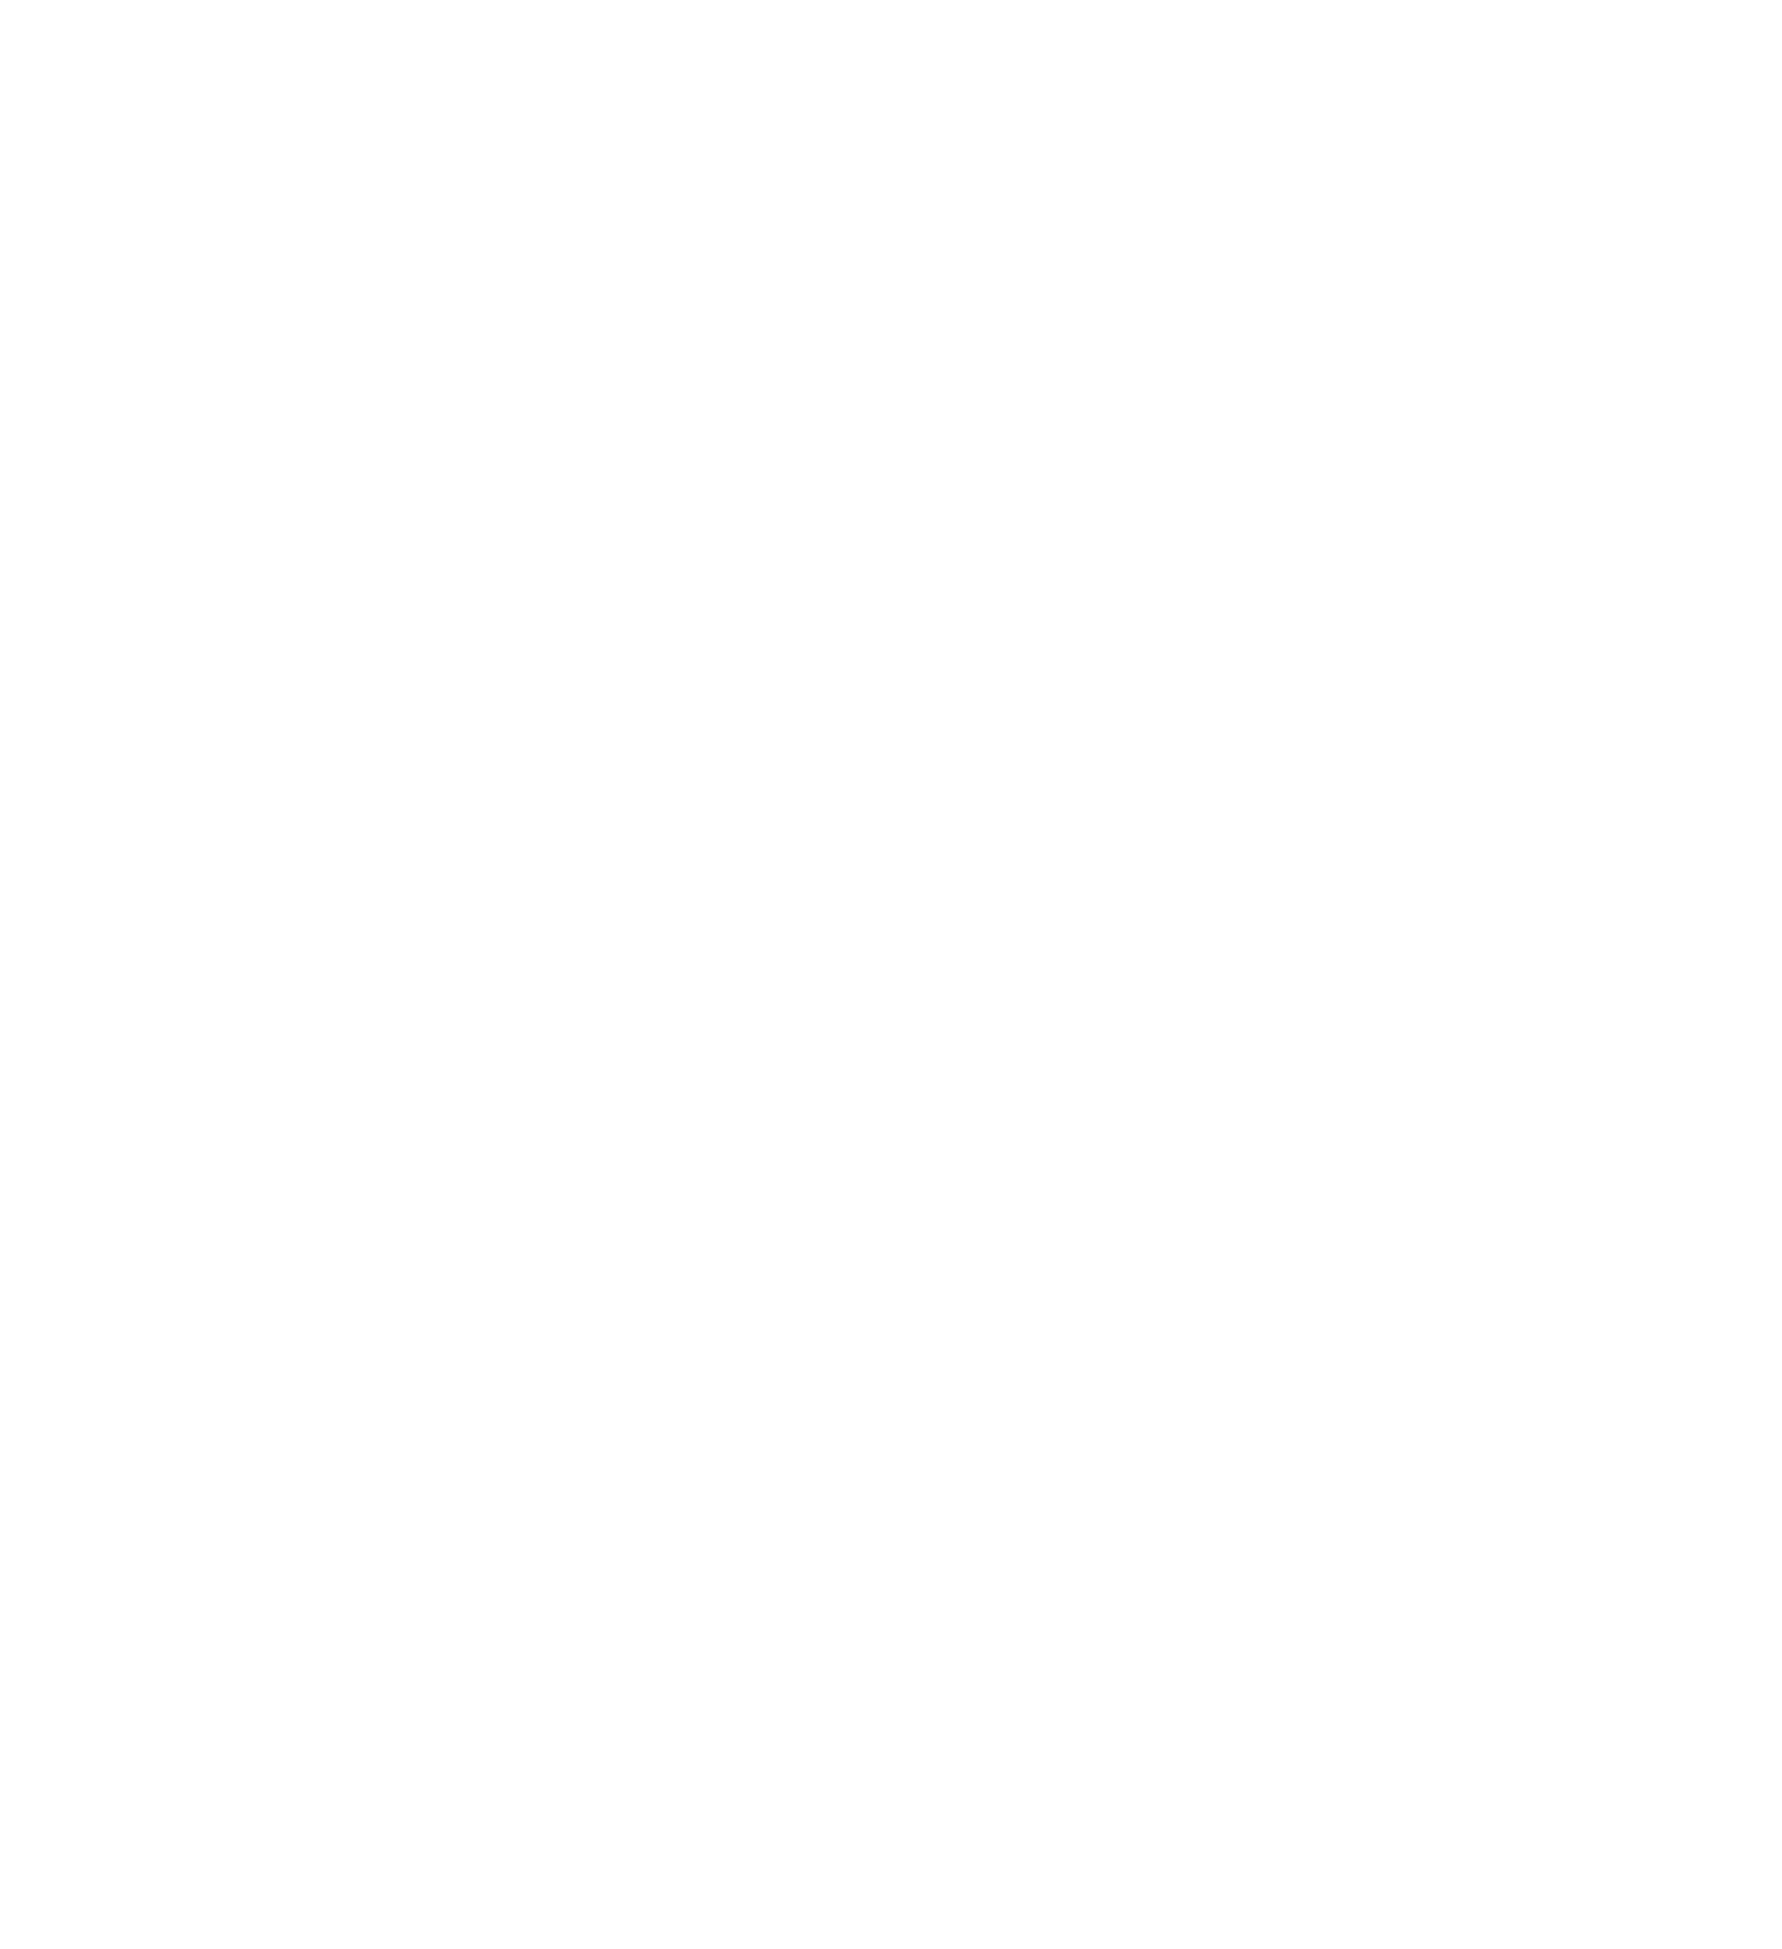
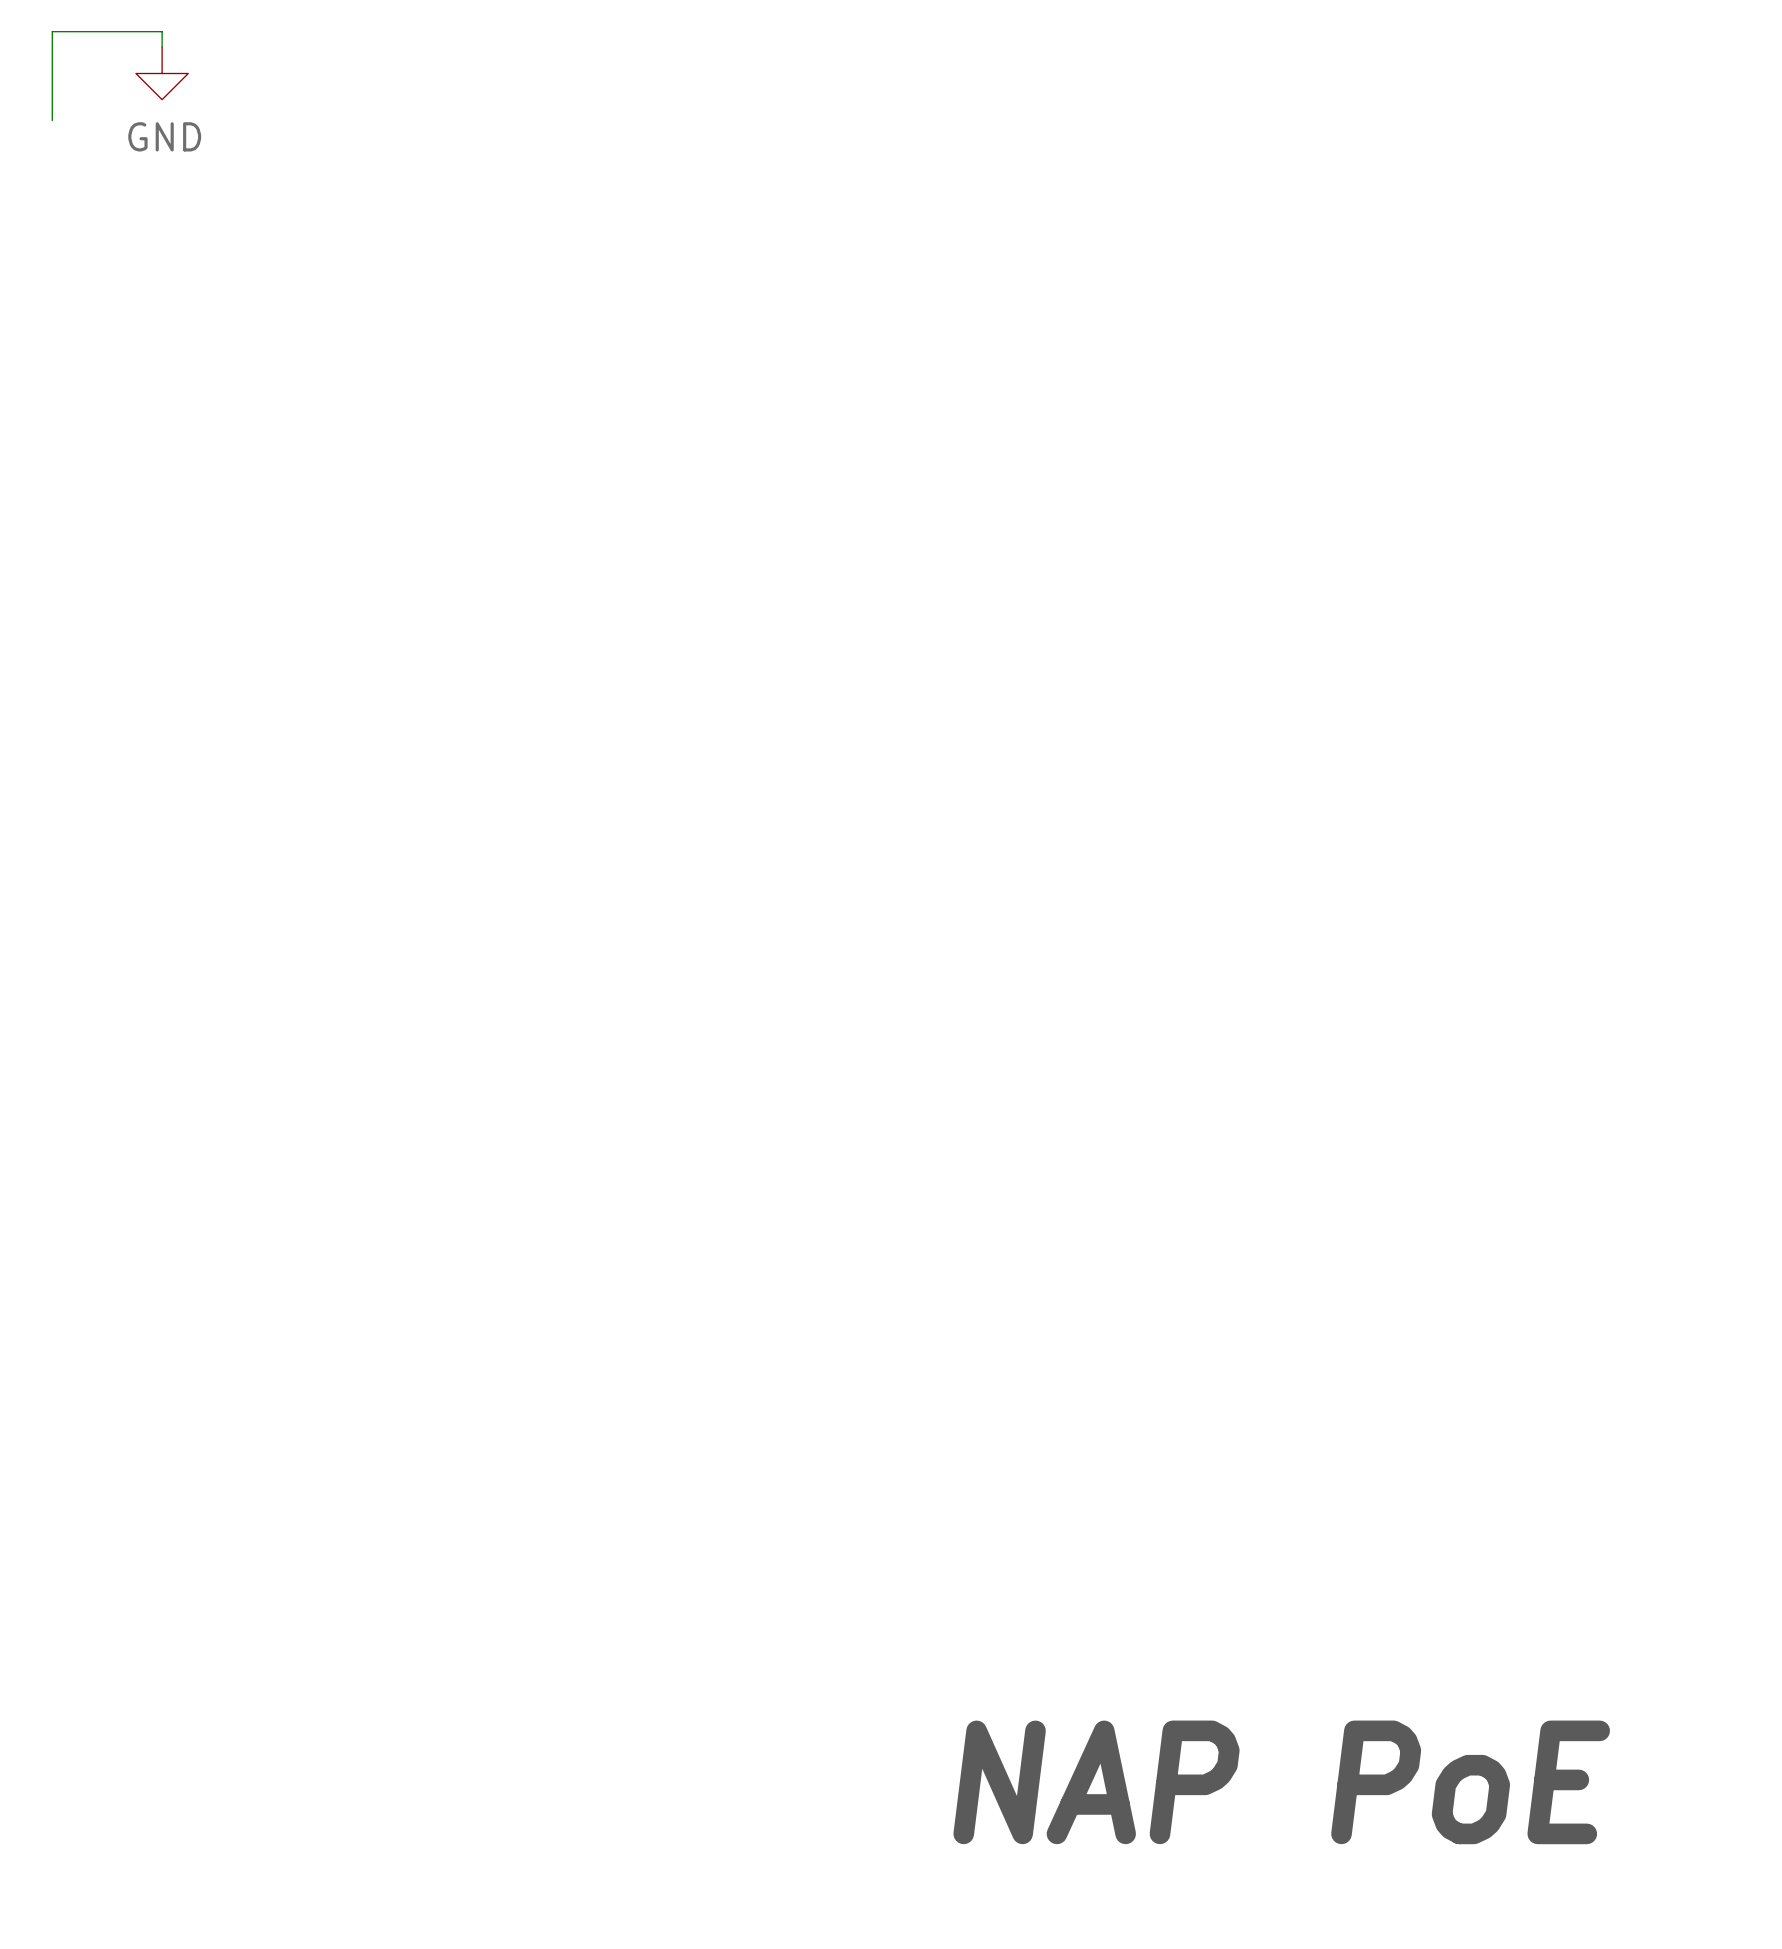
wire: none -> (162, 47) (162, 31) (52, 31) (52, 120)
power symbol: none -> GND (162, 73)
text: none -> NAP PoE (1281, 1782)

